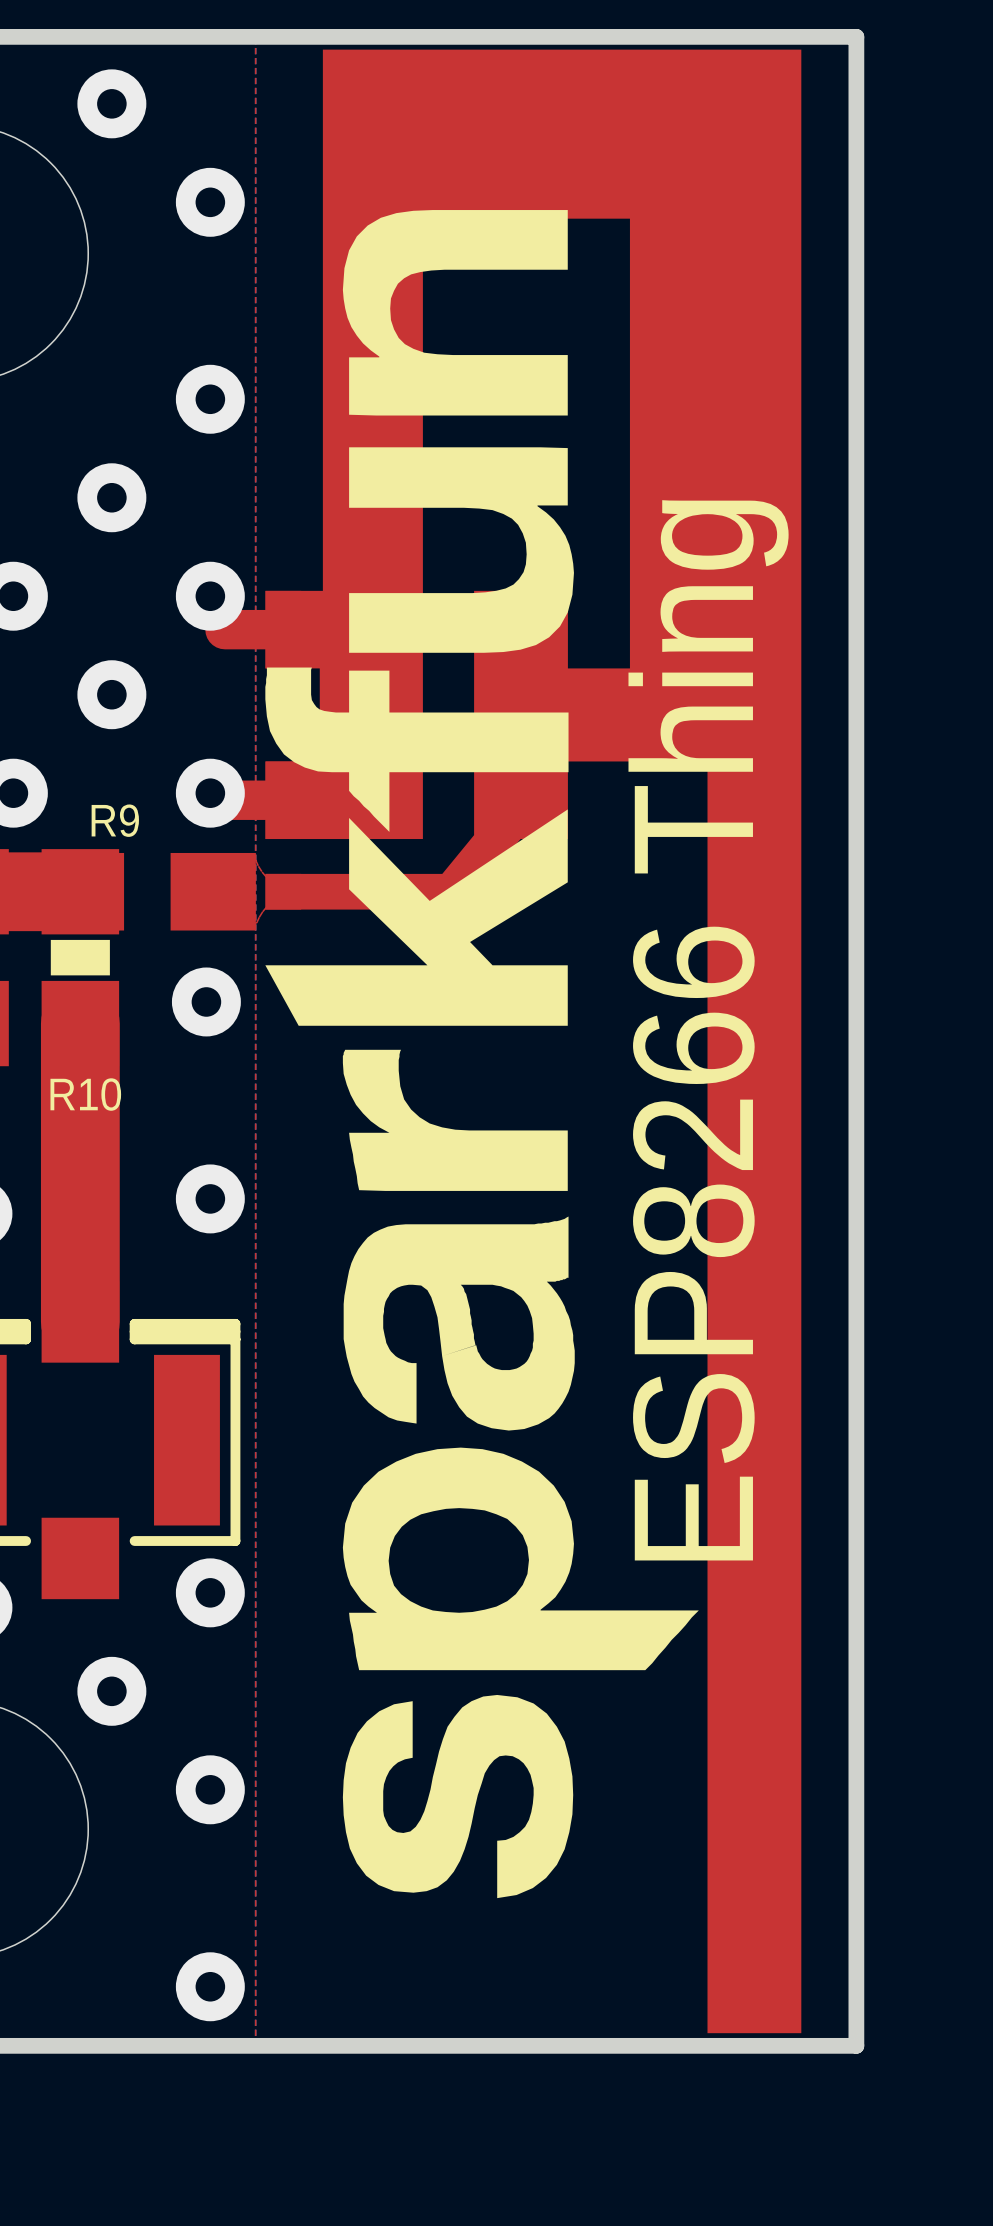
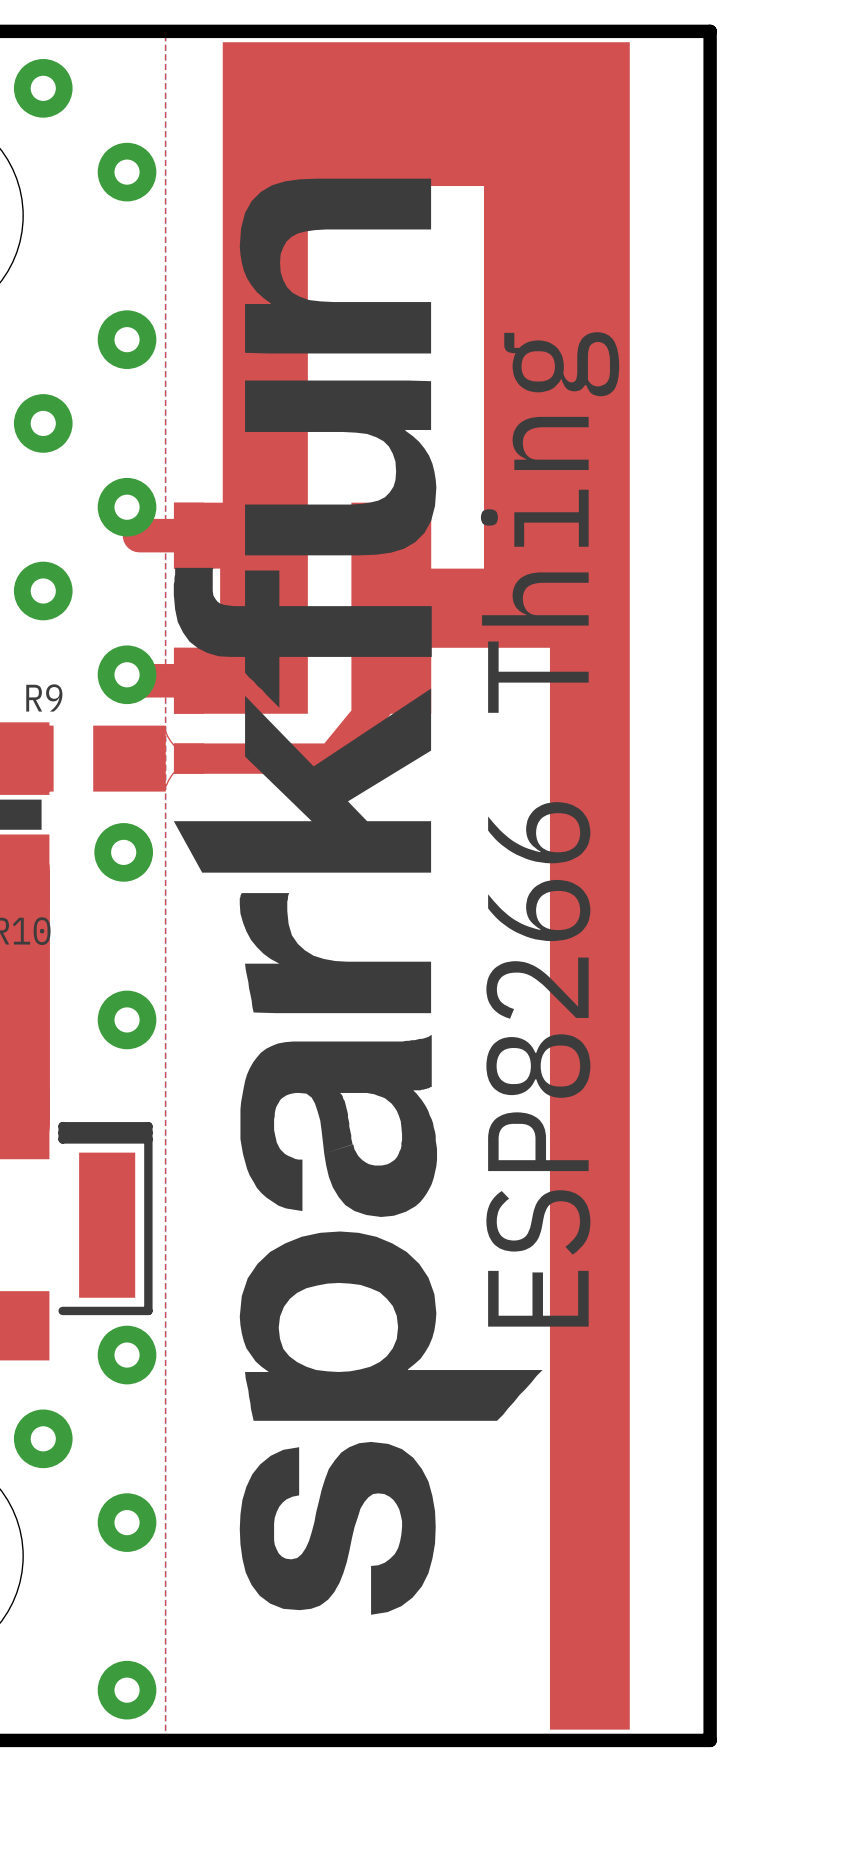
board edge: (856, 36) (856, 2045) -> (676, 31) (710, 31) (710, 1740) (676, 1740)

